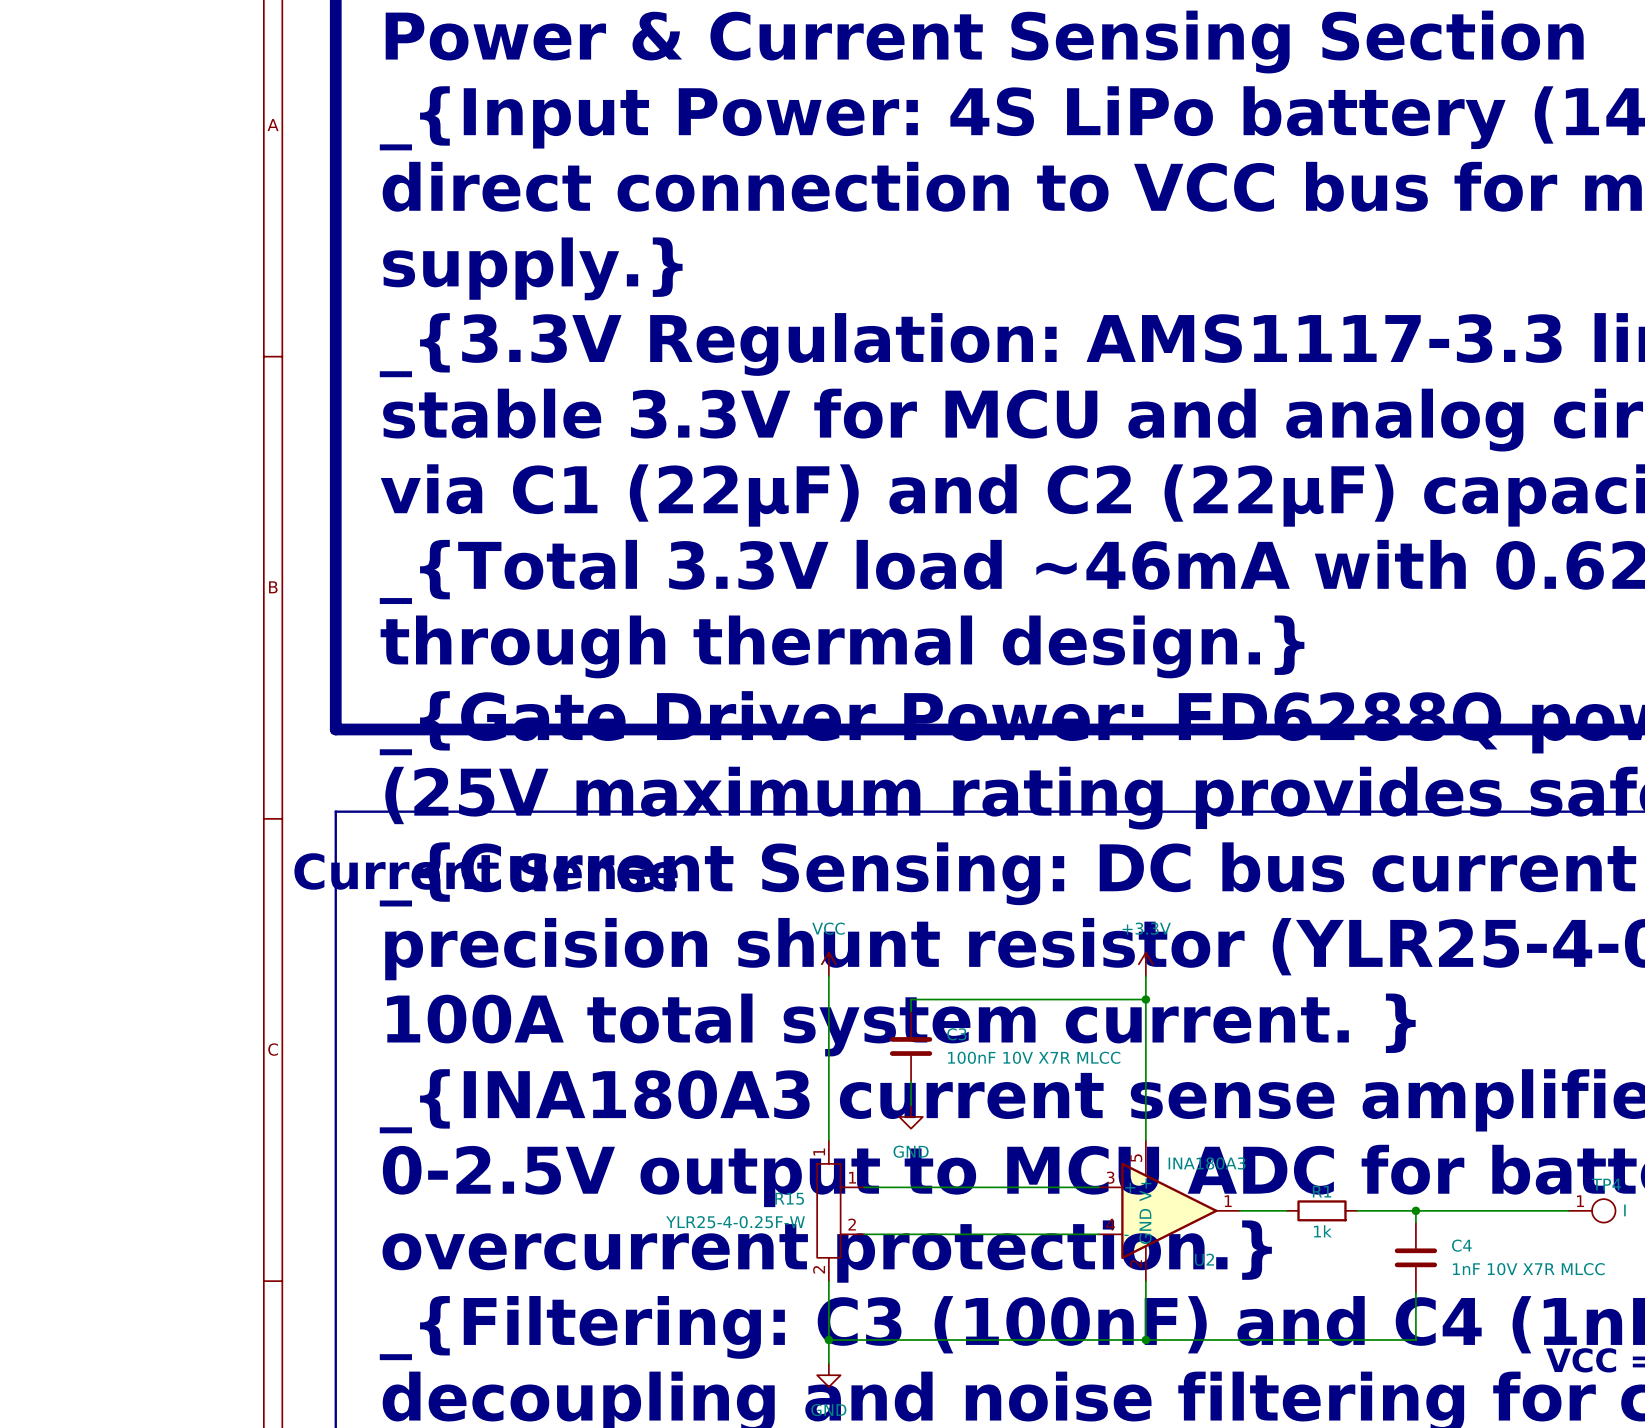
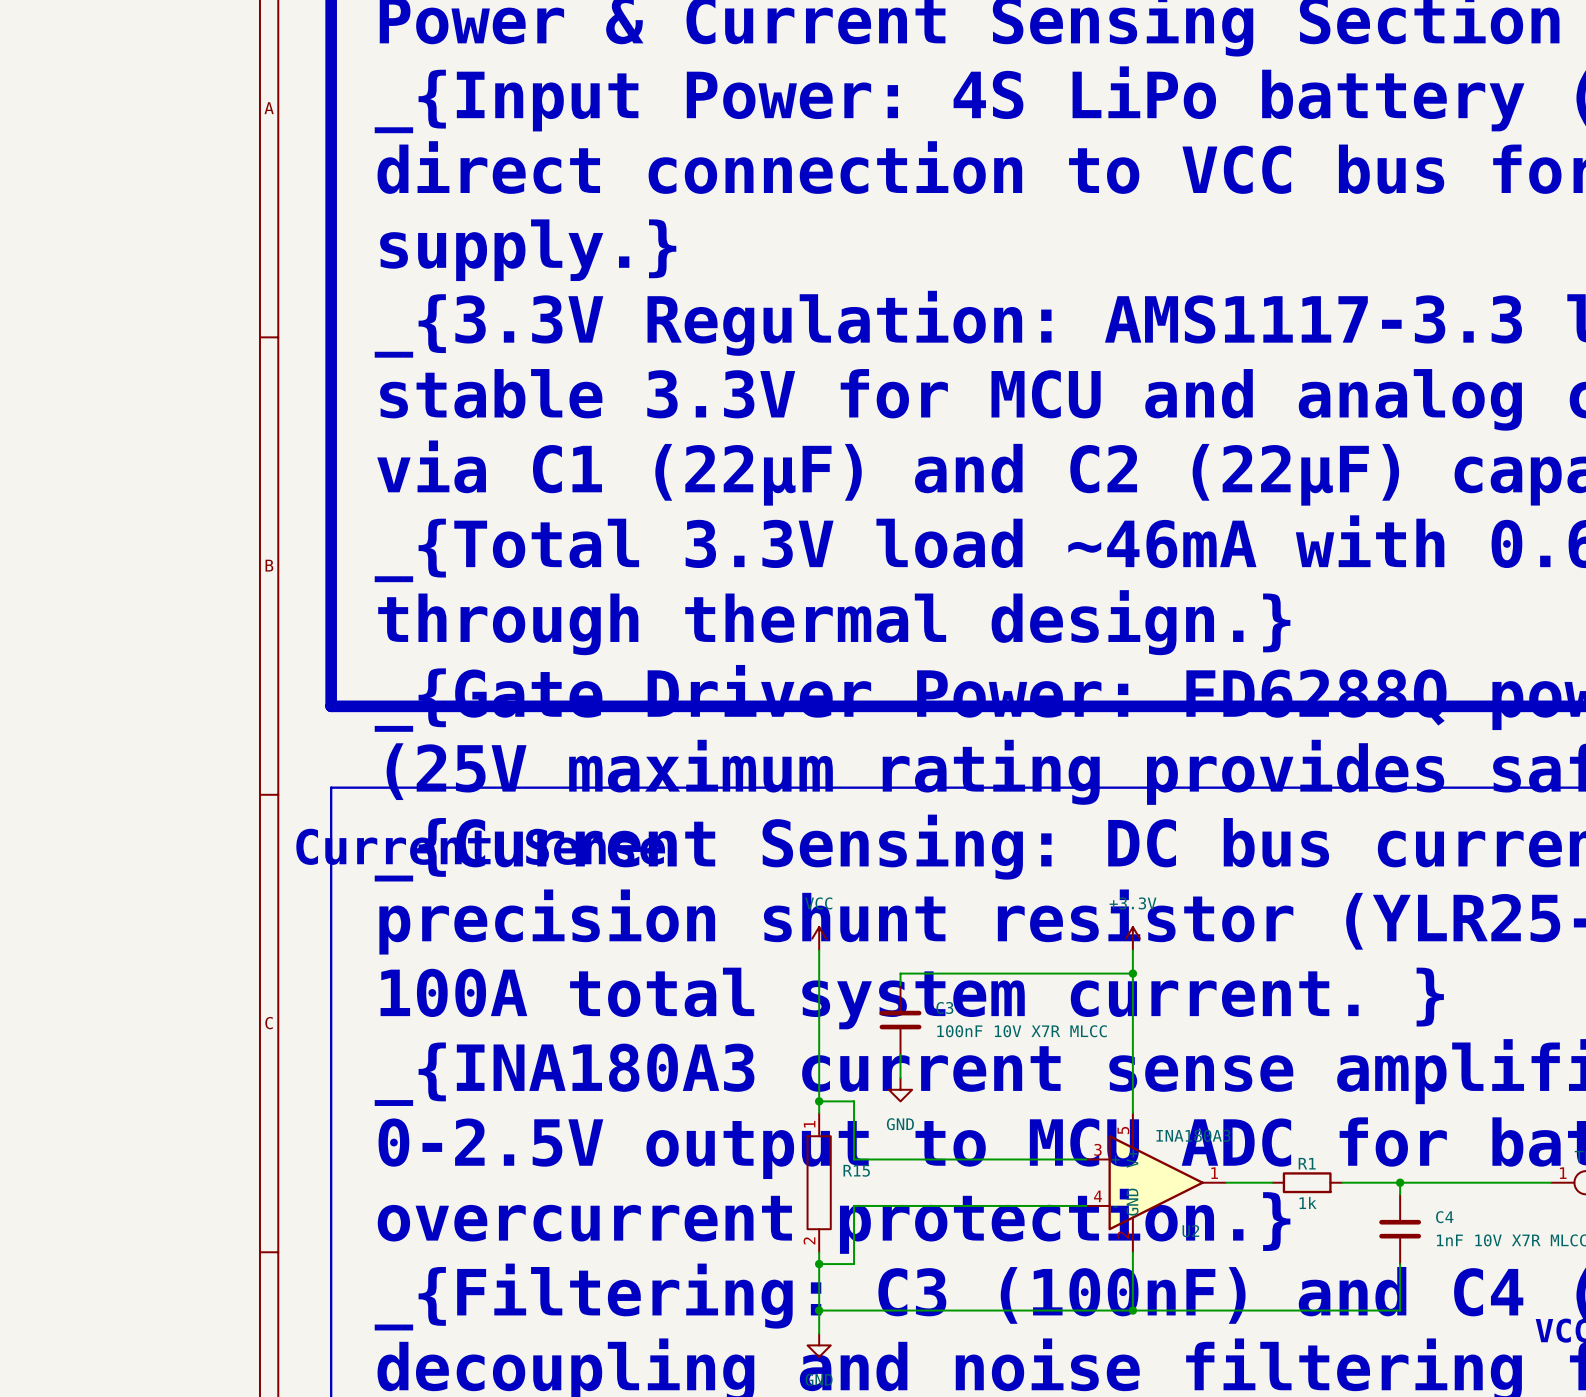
wire: none -> (819, 1101) (854, 1101) (854, 1159)
junction: none -> (819, 1101)
R15 symbol: [817, 1140, 865, 1282] -> [807, 1113, 831, 1253]
R15 name position: R15 (789, 1198) -> R15 (856, 1170)
R15 value: YLR25-4-0.25F-W (735, 1222) -> none
wire: none -> (854, 1205) (854, 1264) (819, 1264)
junction: none -> (819, 1264)

